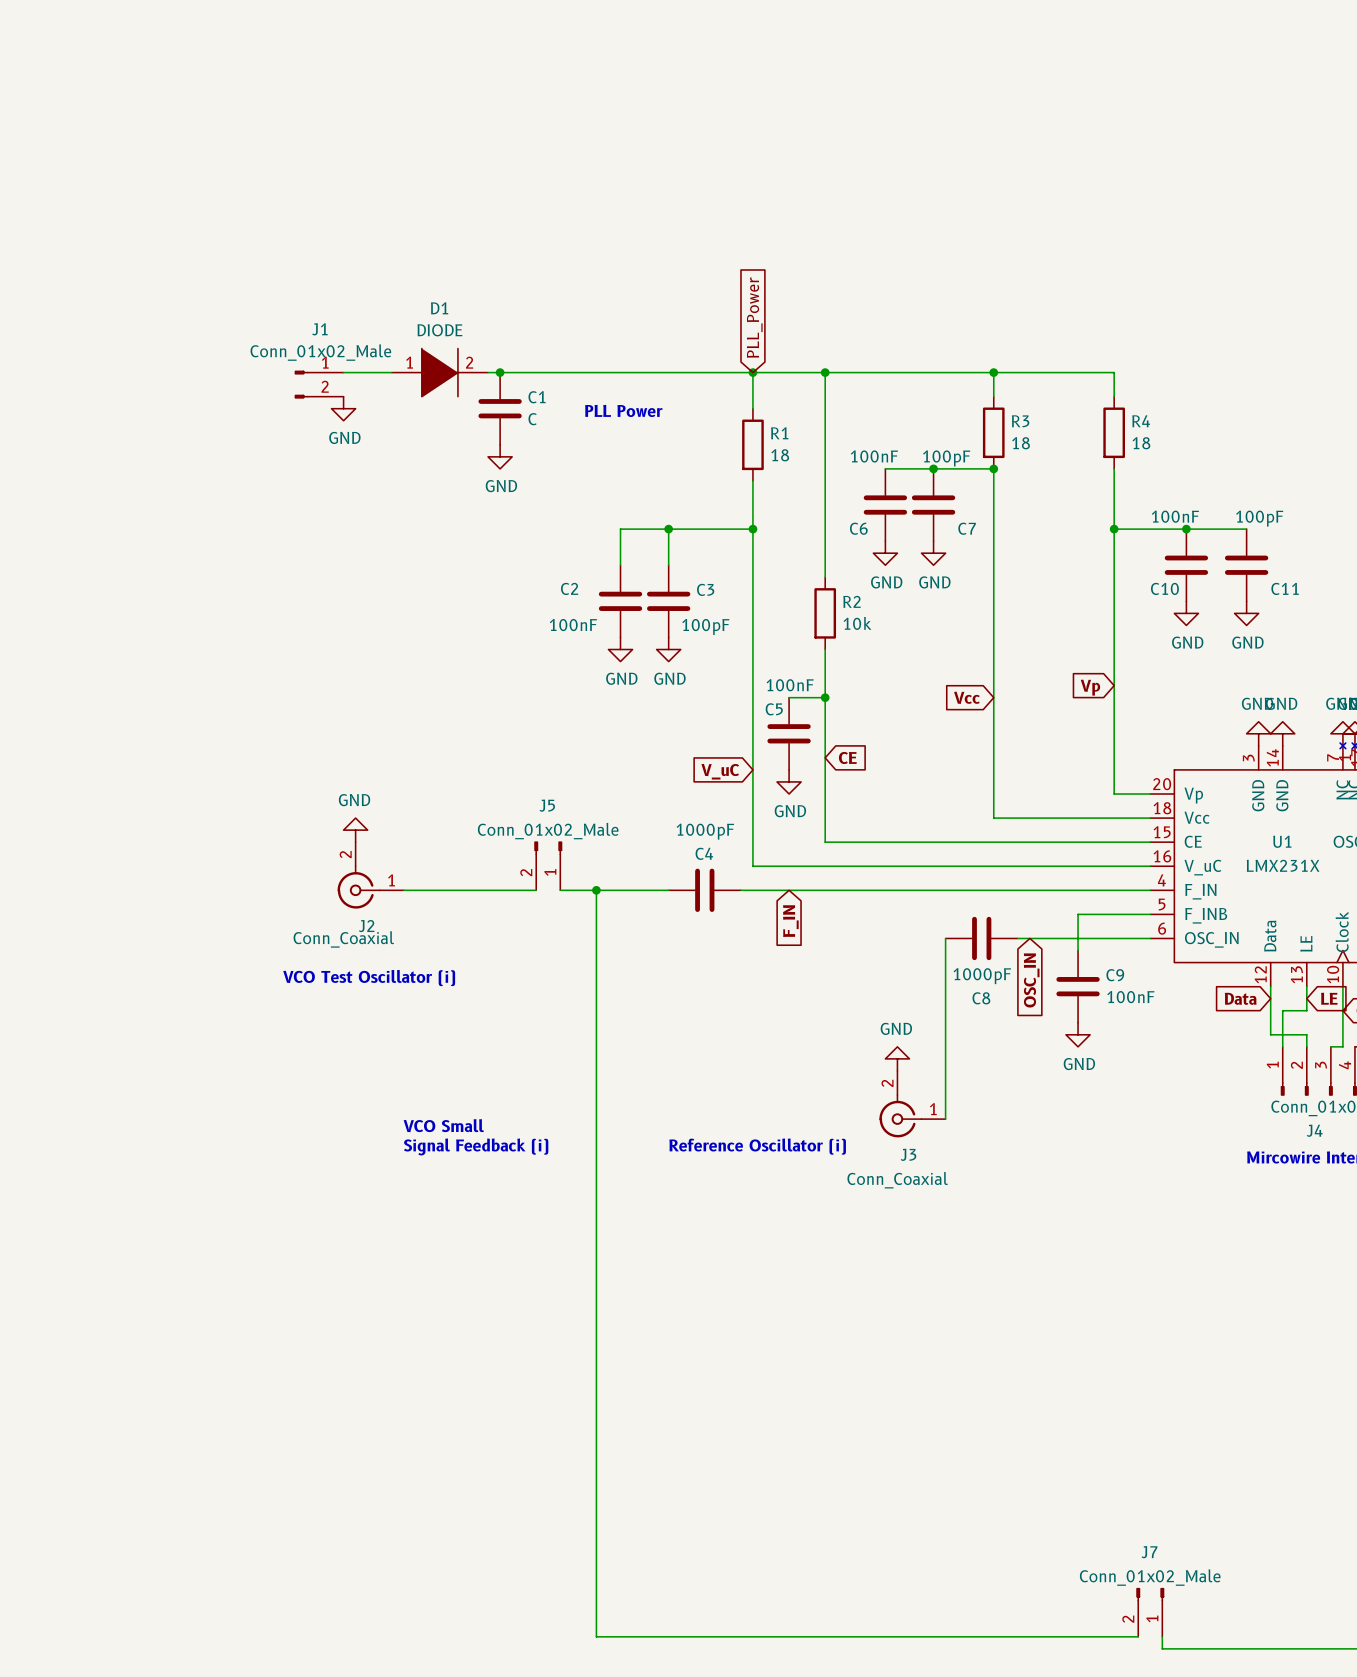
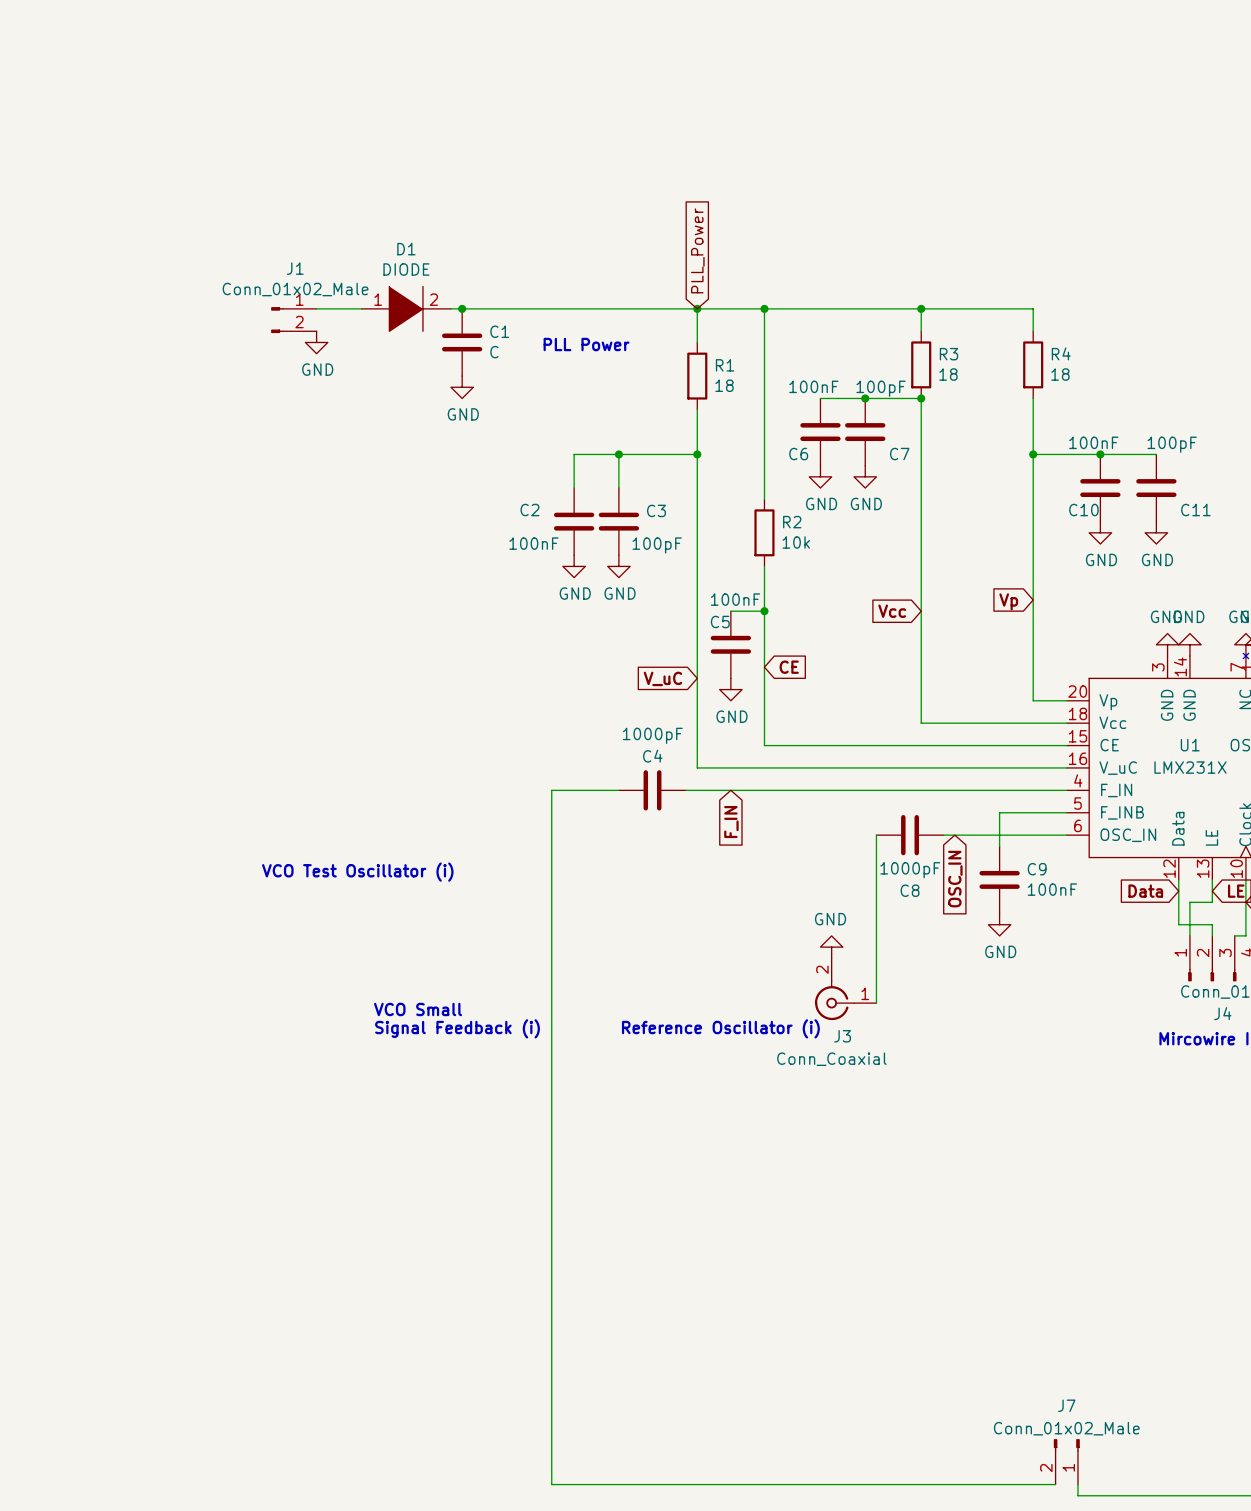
power symbol: GND (355, 830) -> none
J5: Conn_01x02_Male (548, 865) -> none
J2: Conn_Coaxial (370, 875) -> none
wire: (403, 890) (536, 890) -> none
wire: (560, 890) (596, 890) -> none
junction: (596, 890) -> none

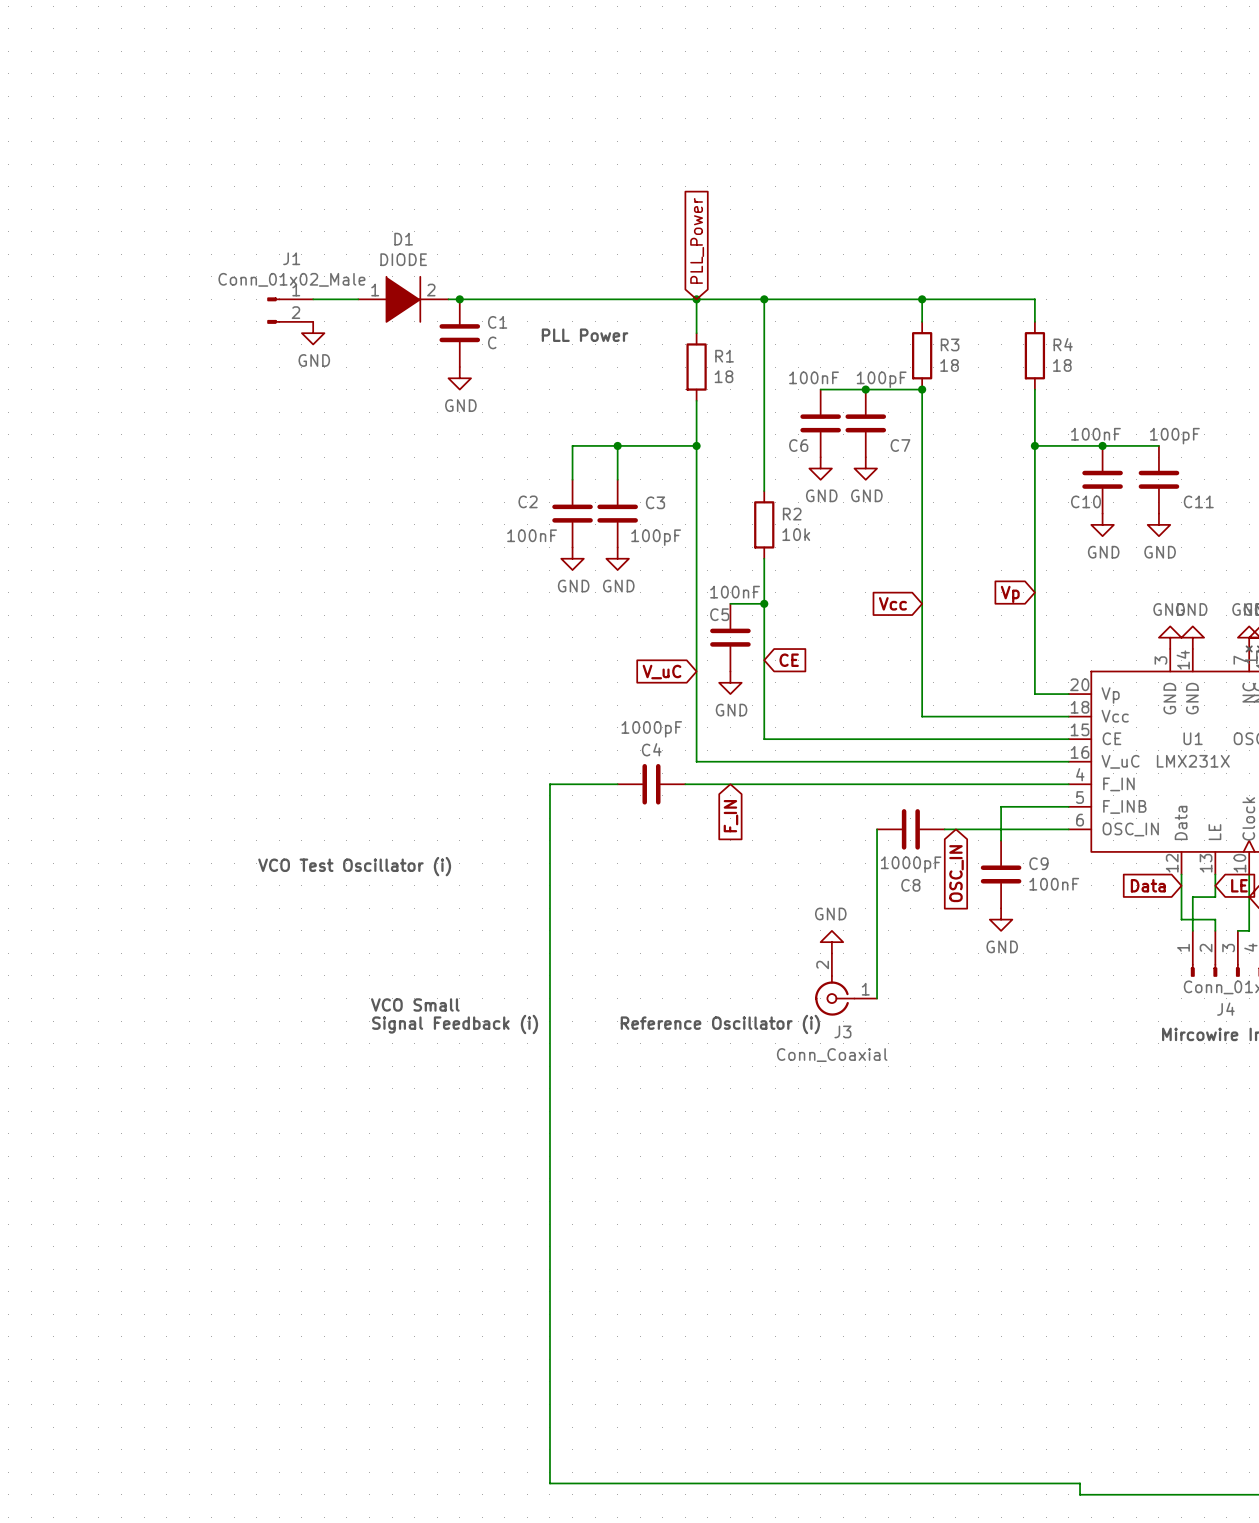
J7: Conn_01x02_Male (1066, 1461) -> none
wire: none -> (1057, 1483) (1080, 1483)

